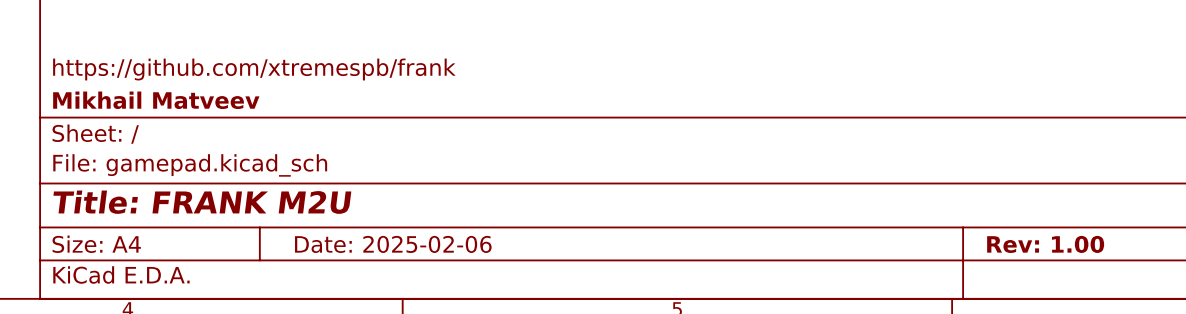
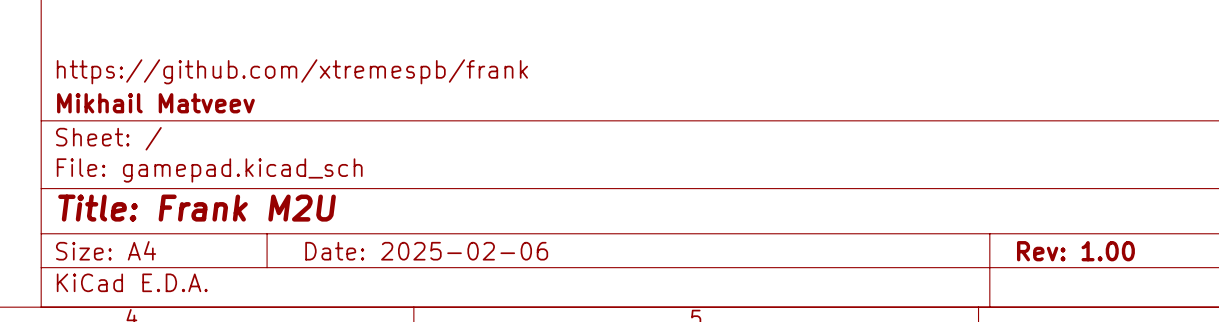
title block: Title: FRANK M2U (202, 202) -> Title: Frank M2U (197, 208)

